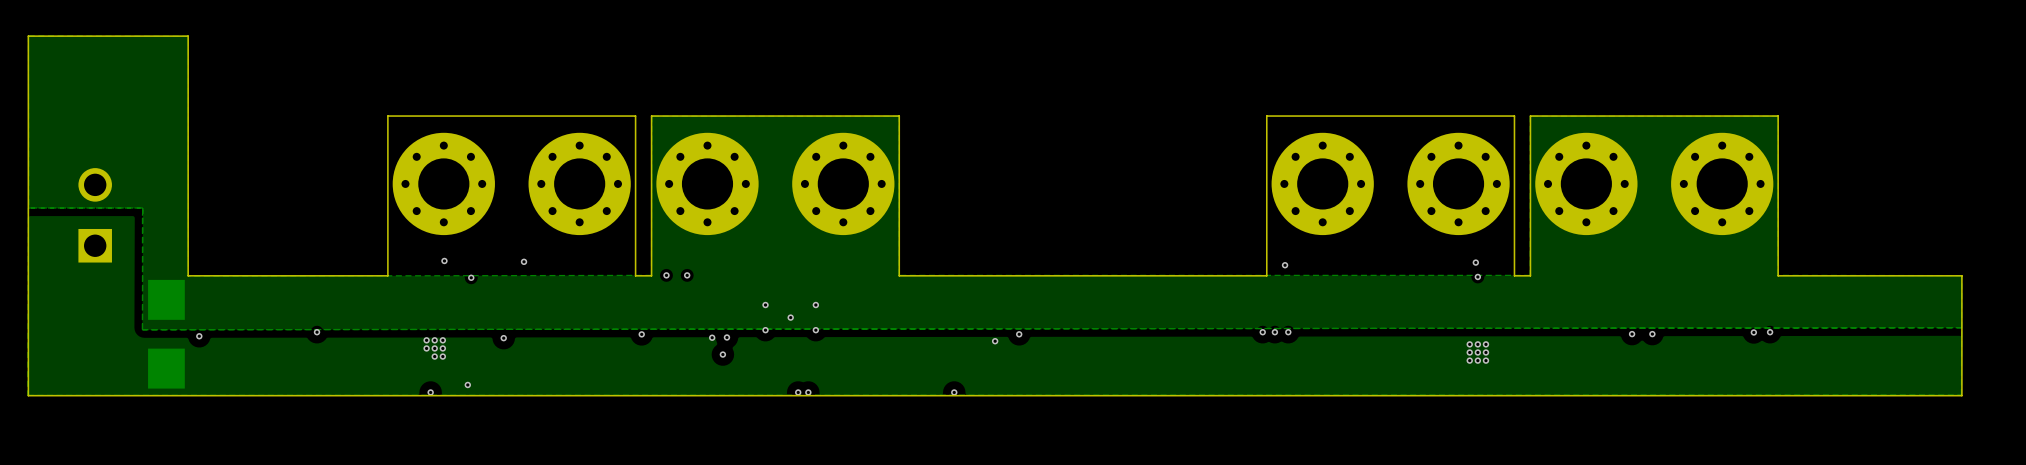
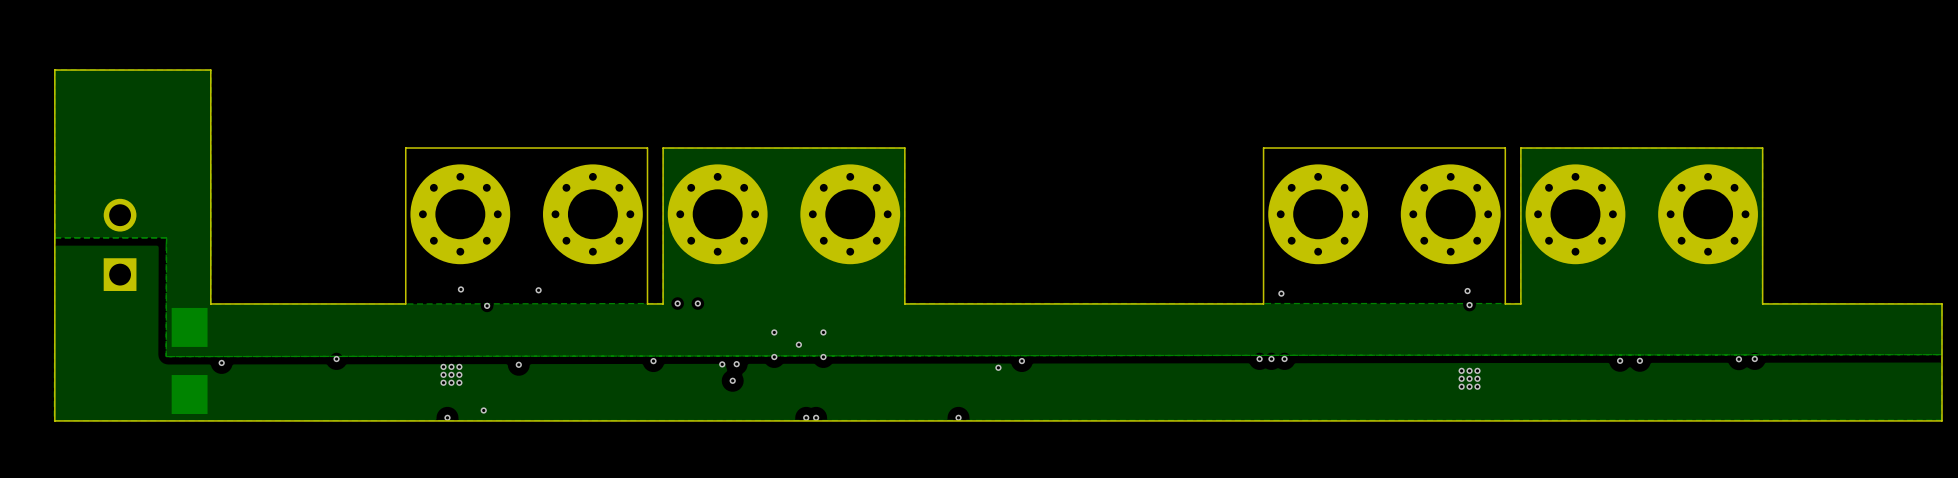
via: none -> (443, 382)

